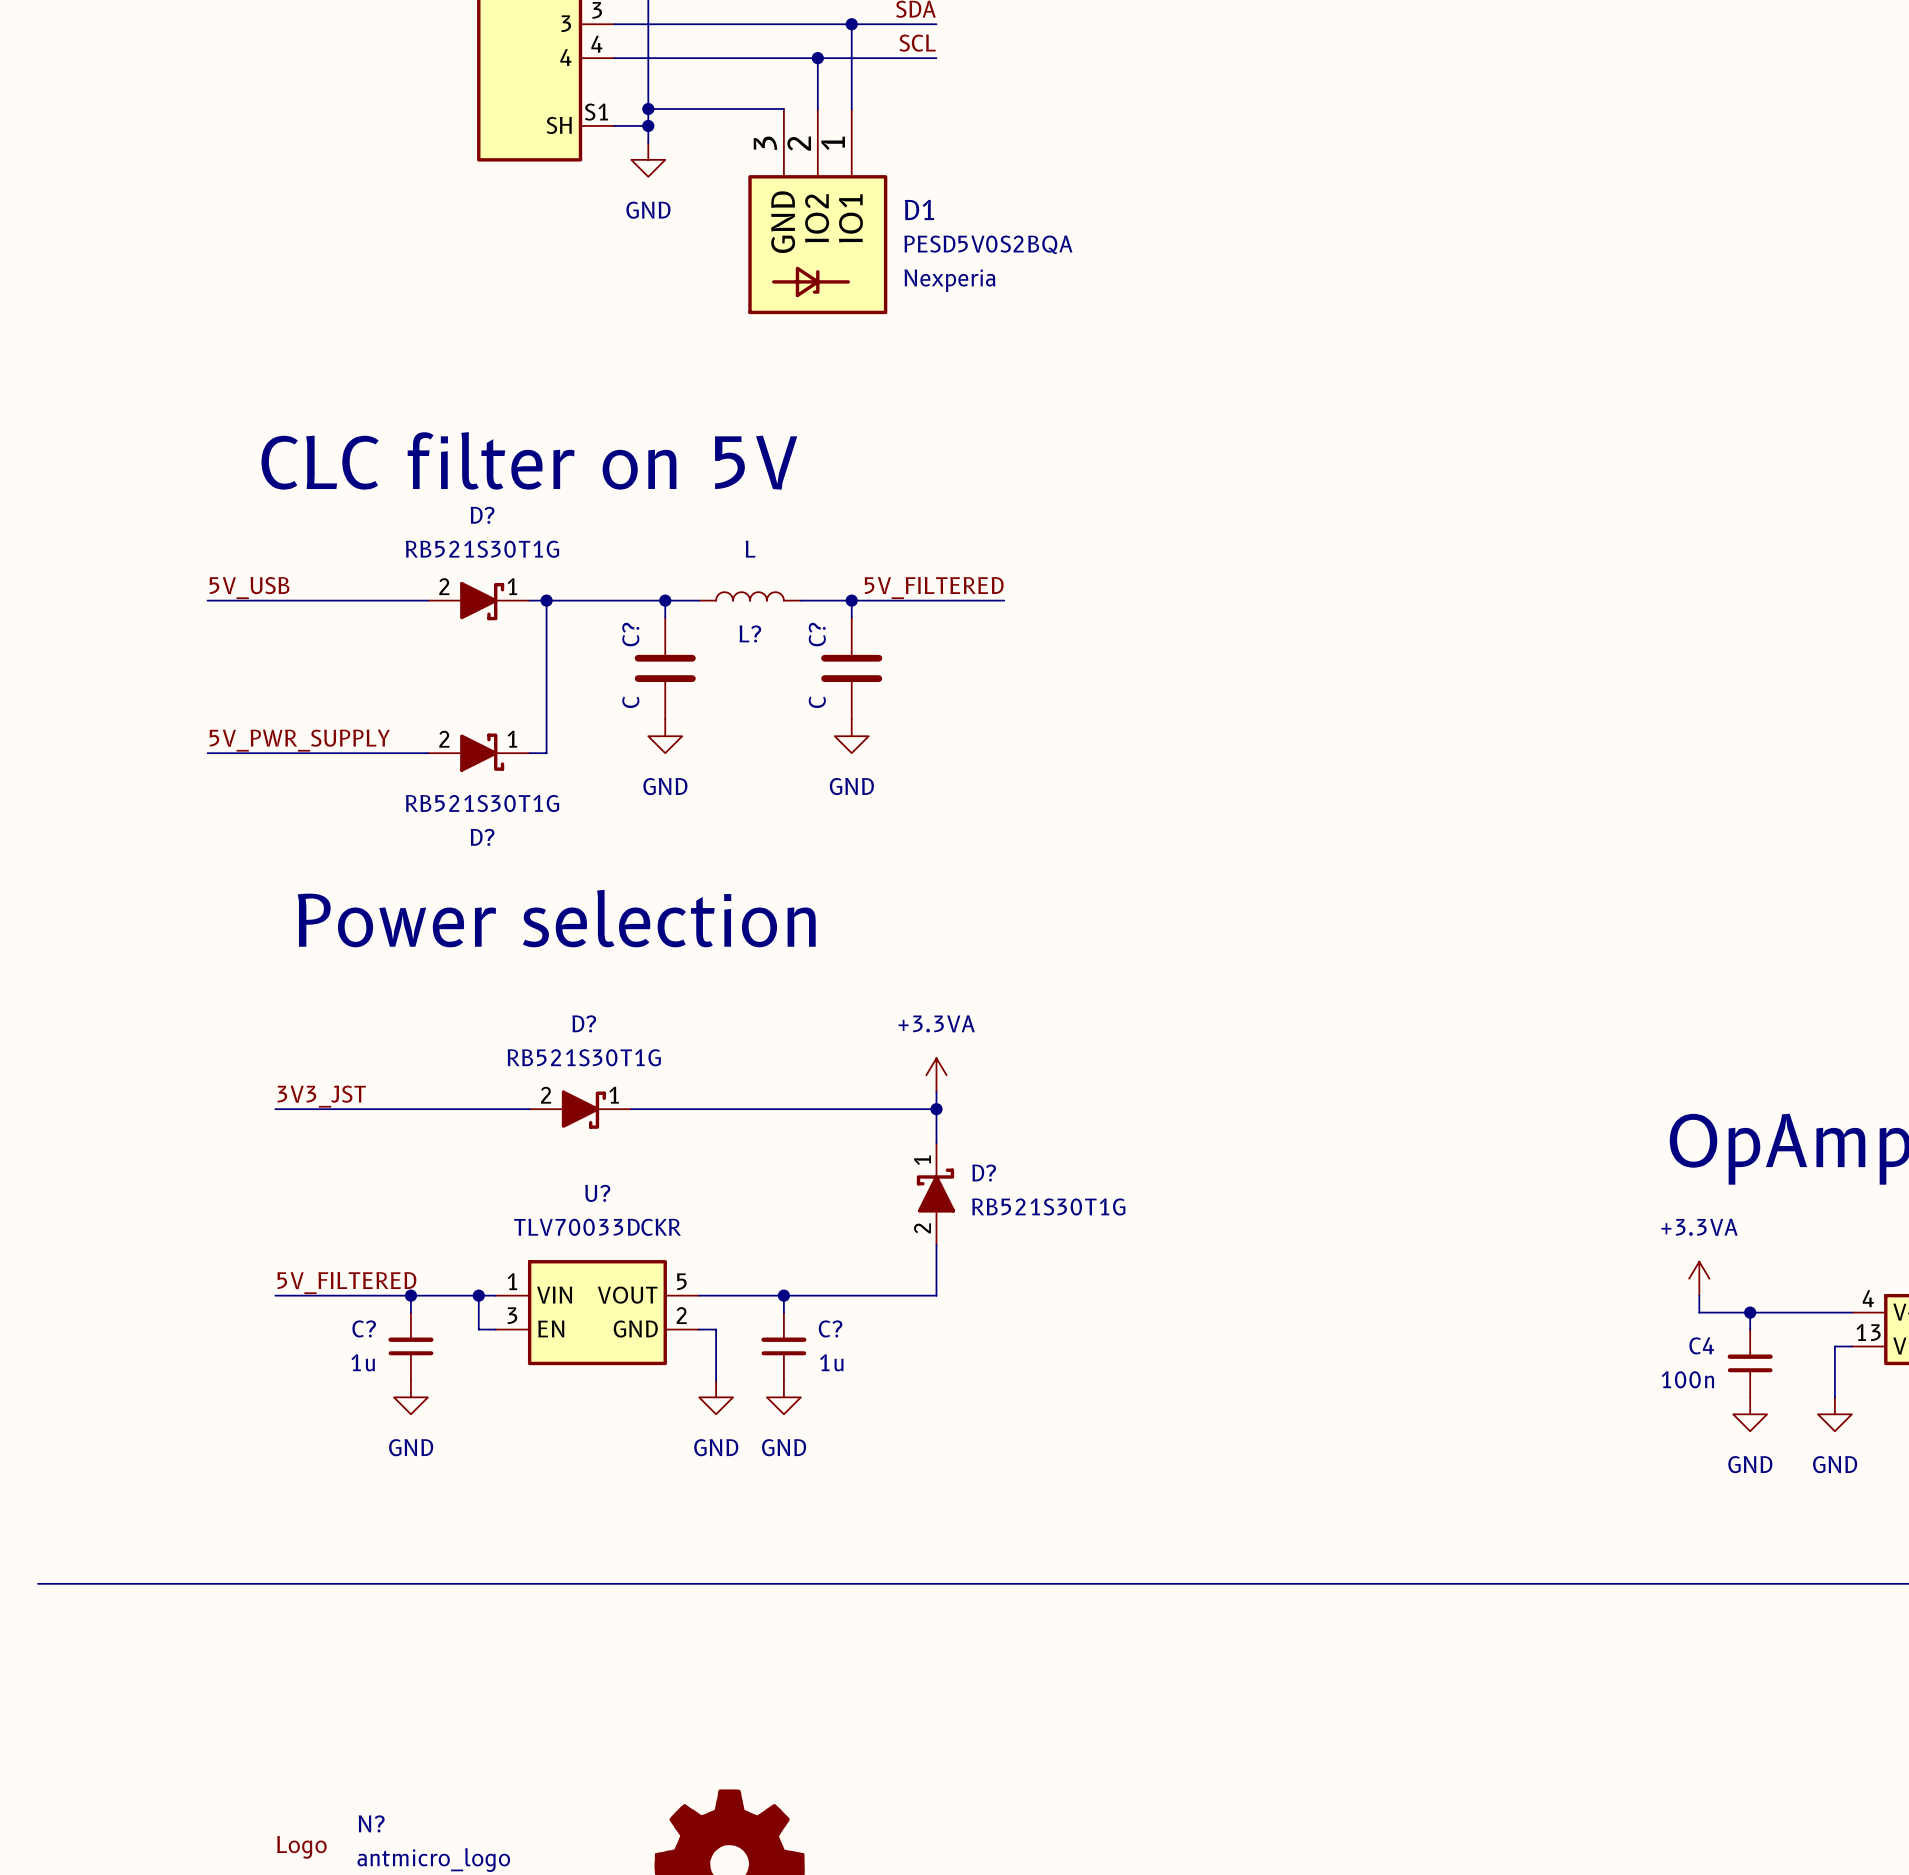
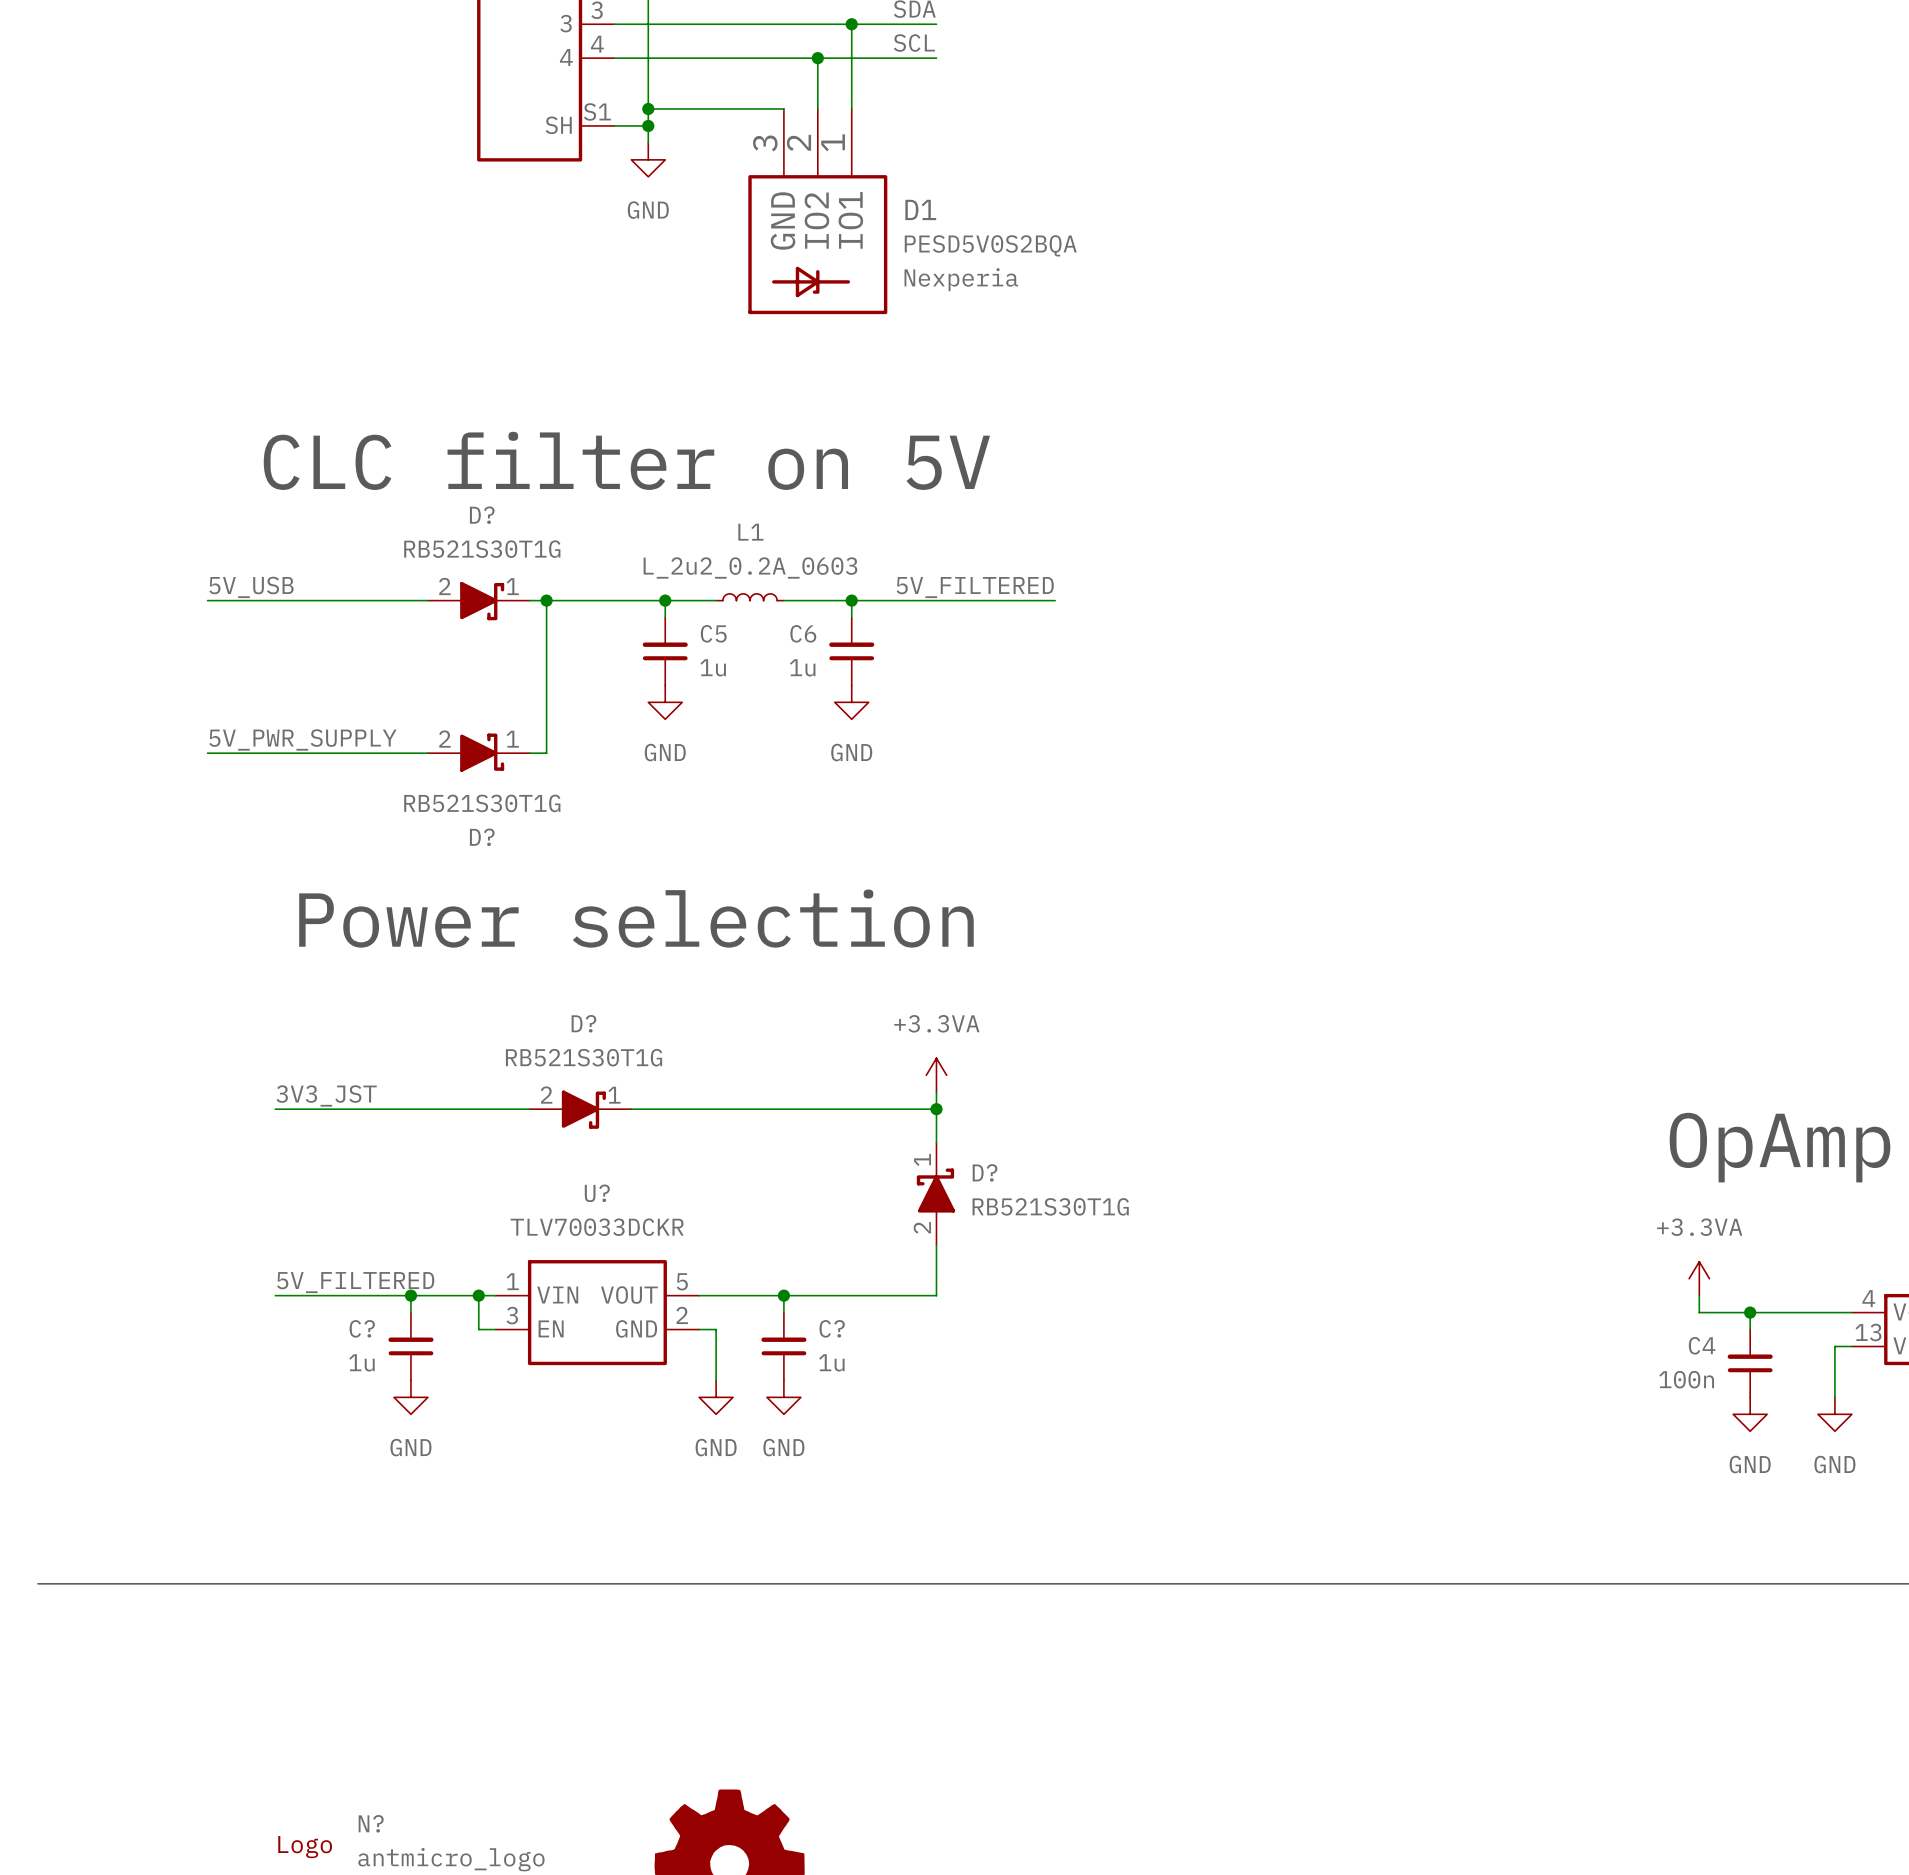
label position: 5V_FILTERED (934, 588) -> 5V_FILTERED (975, 587)
L?: L (750, 596) -> none
L1: none -> L_2u2_0.2A_0603 (750, 597)
wire: none -> (1004, 600) (1055, 600)
C5: none -> (665, 651)
C6: none -> (851, 651)
C?: C (665, 668) -> none
C?: C (851, 668) -> none
power symbol position: GND (665, 736) -> GND (665, 702)
power symbol position: GND (851, 736) -> GND (851, 702)

